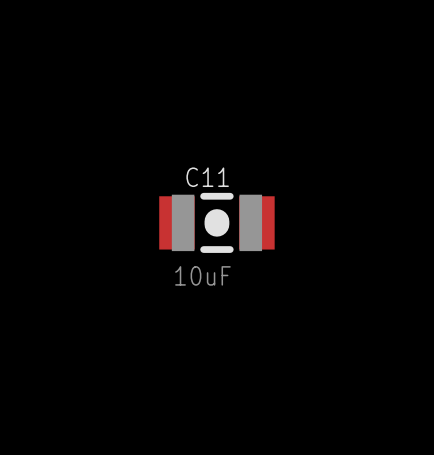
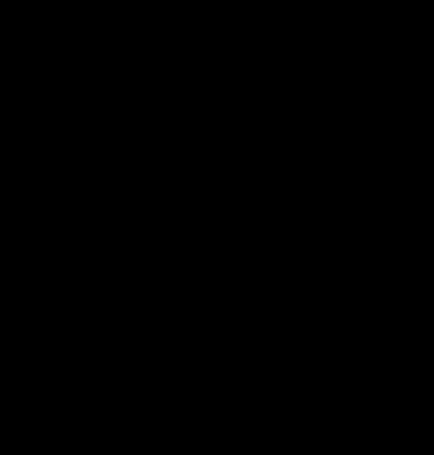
C11: 10uF (216, 222) -> none

